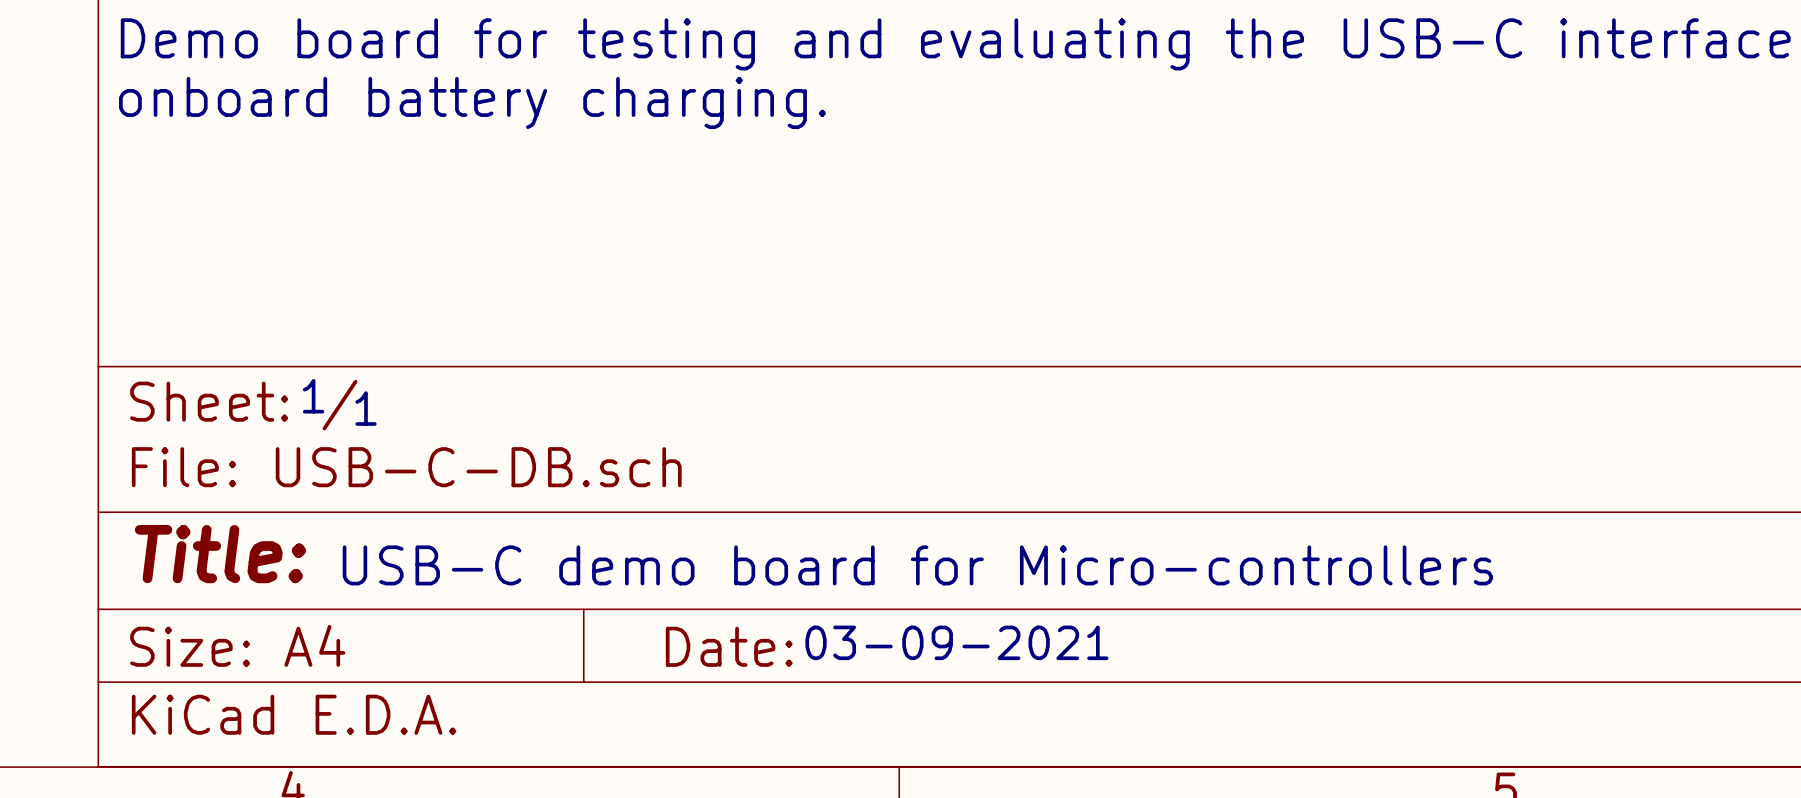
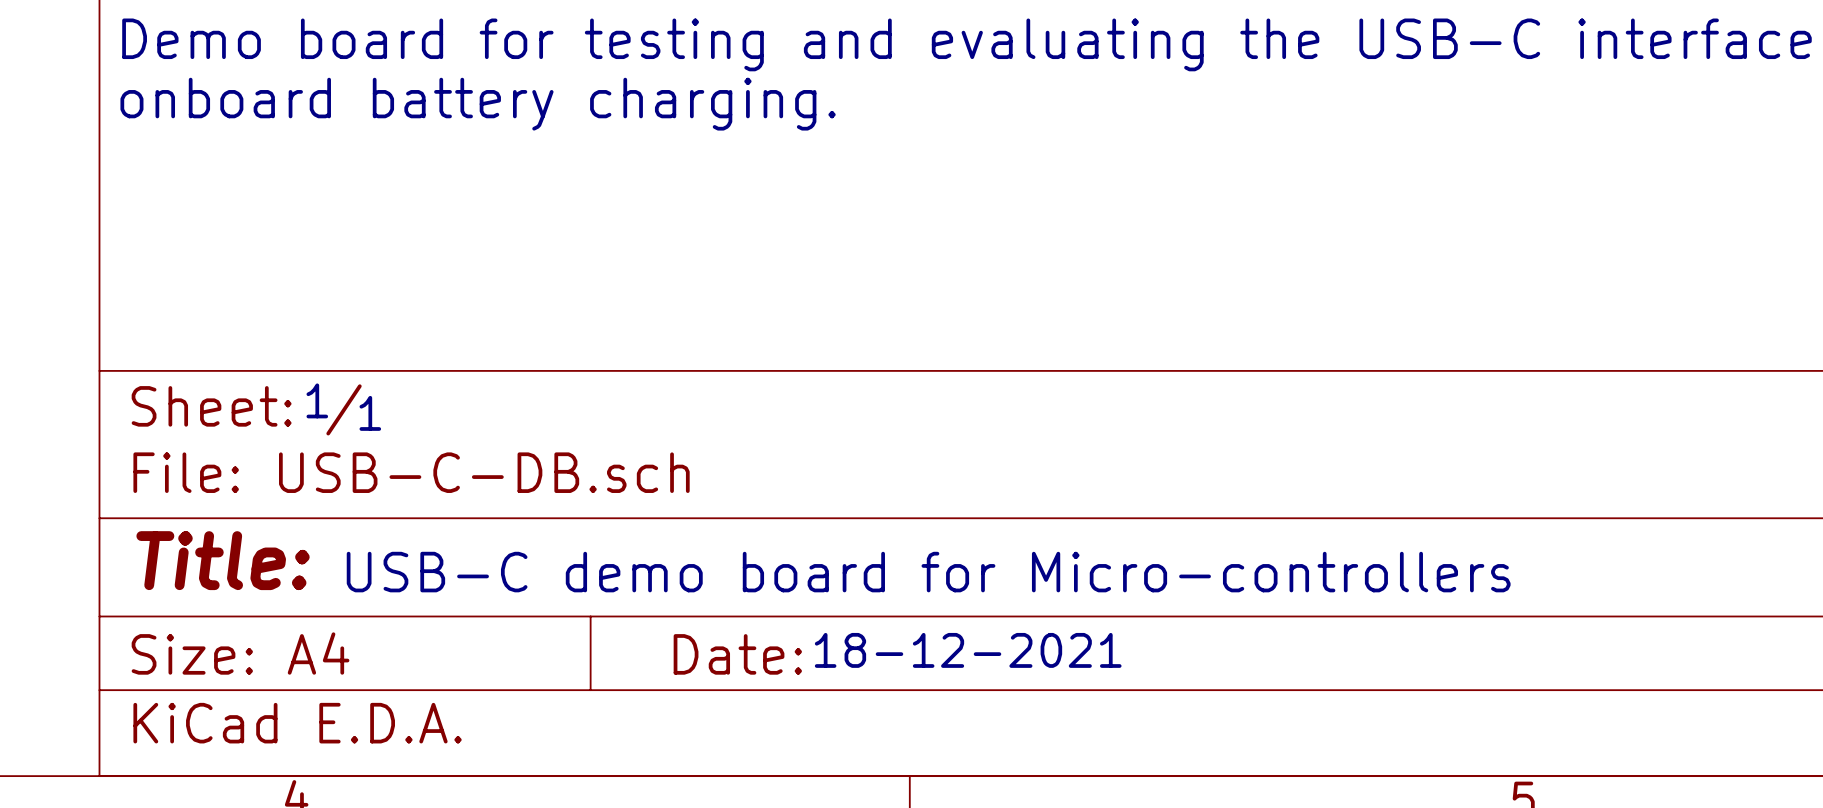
text: 03-09-2021 (956, 642) -> 18-12-2021 (968, 650)

